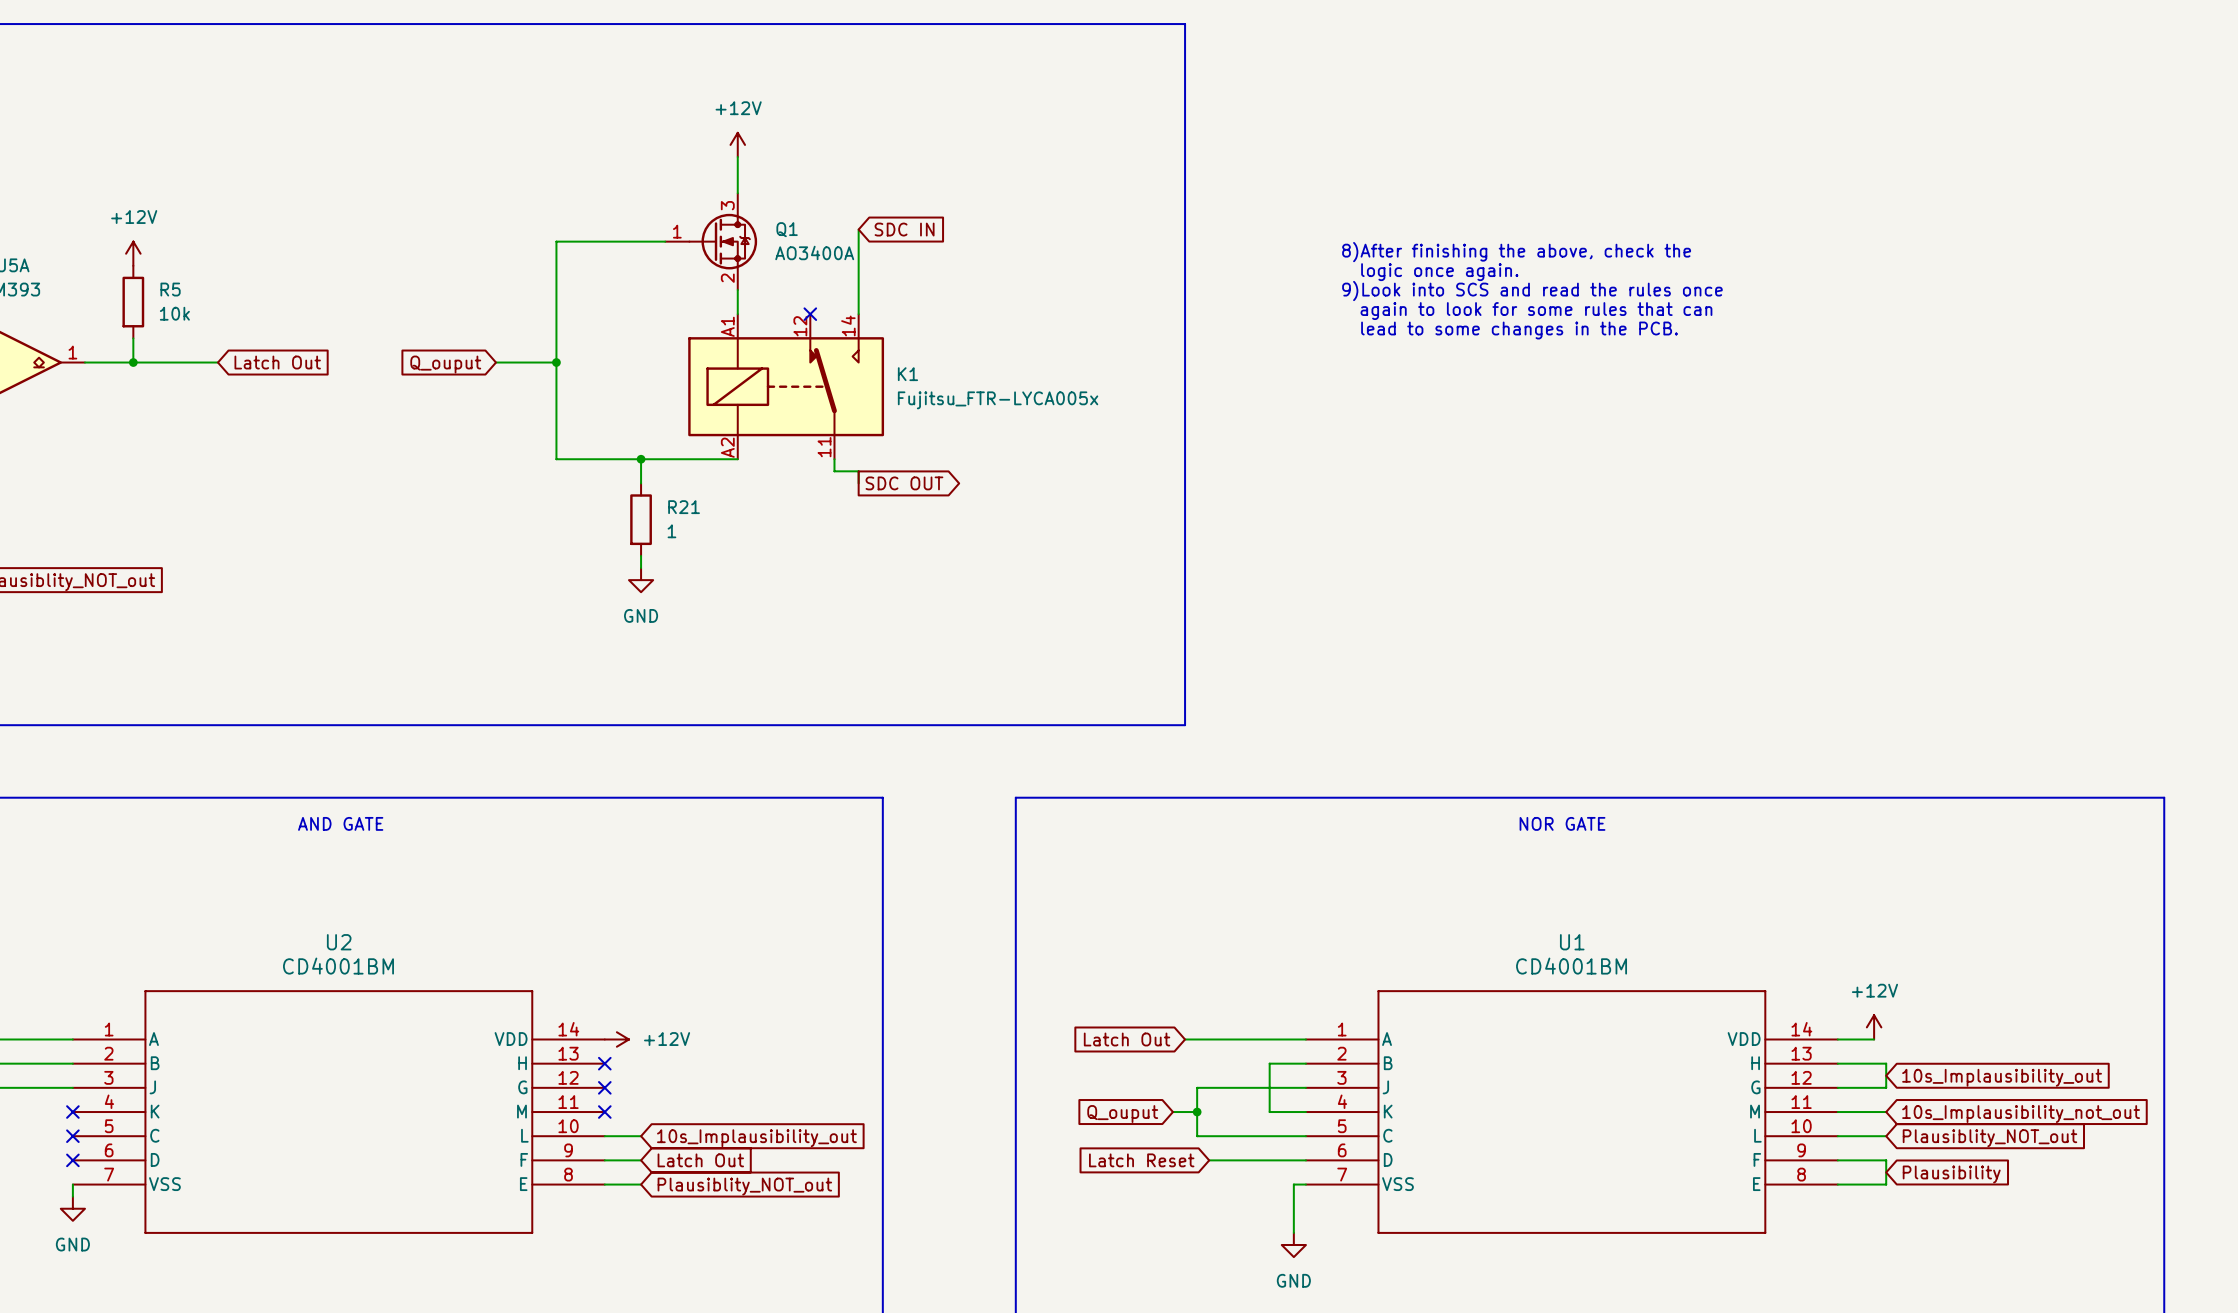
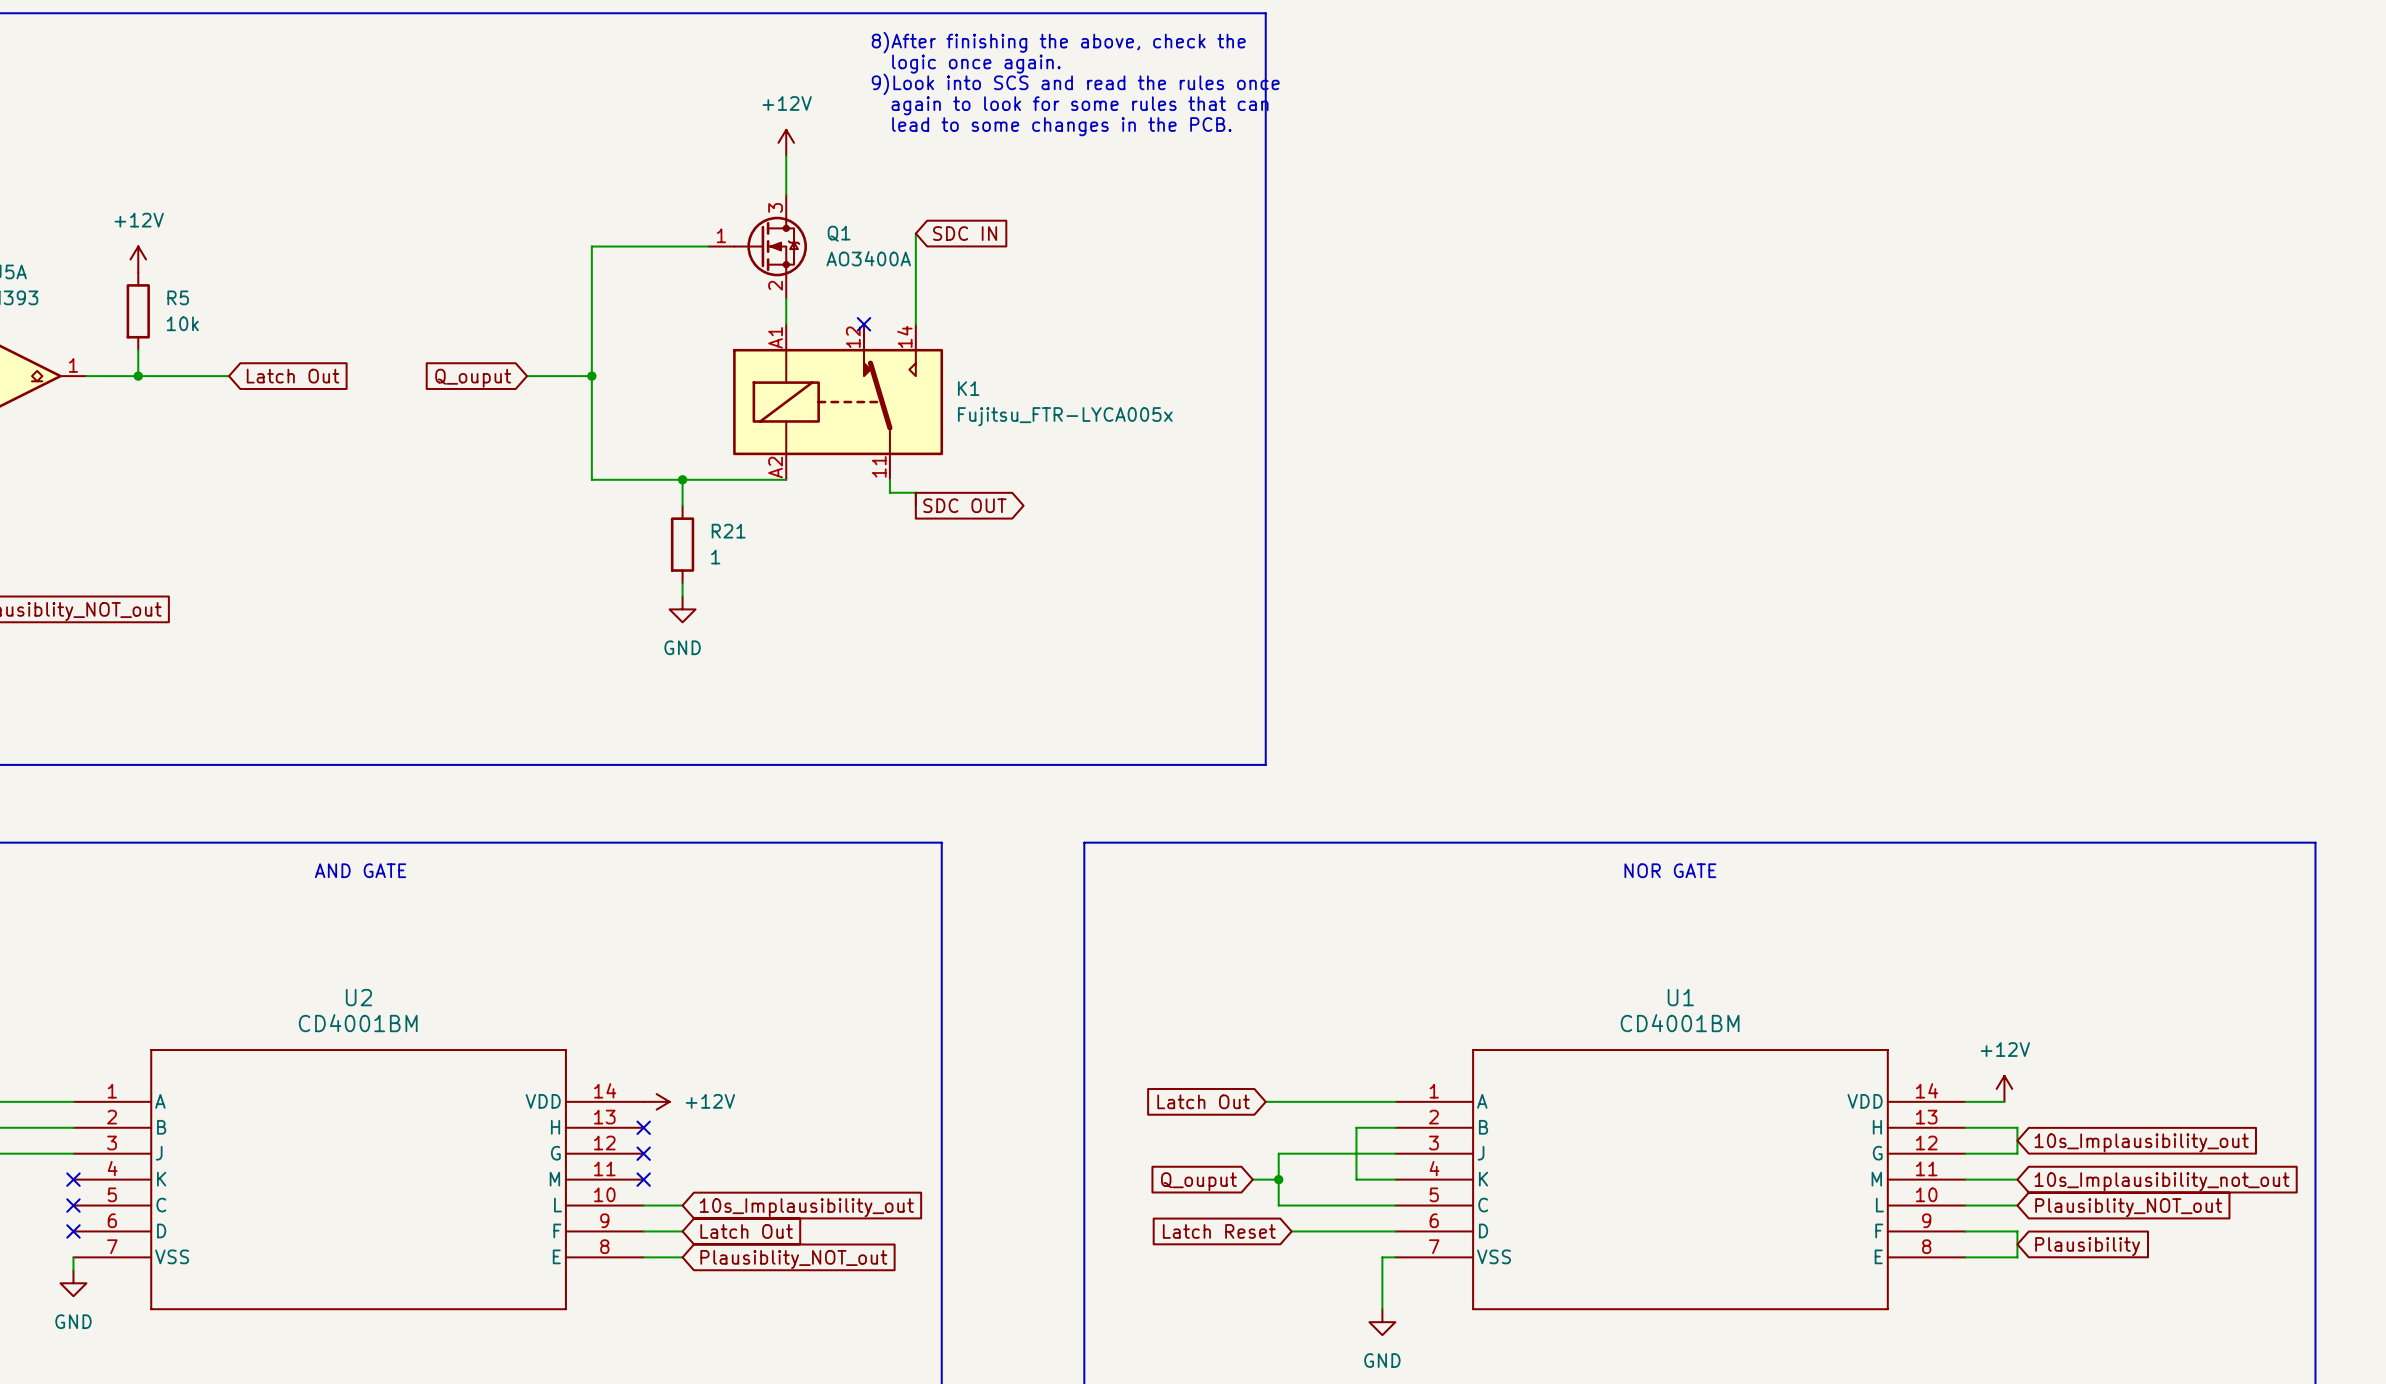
text: none -> 8)After finishing the above, check the (1058, 42)
text: none -> logic once again. (976, 64)
text: none -> 9)Look into SCS and read the rules once (1075, 84)
text: none -> again to look for some rules that can (1080, 105)
text: none -> lead to some changes in the PCB. (1061, 126)
text: 8)After finishing the above, check the (1516, 252) -> none
text: logic once again. (1439, 272) -> none
text: 9)Look into SCS and read the rules once (1532, 291) -> none
text: again to look for some rules that can (1536, 311) -> none
text: lead to some changes in the PCB. (1519, 330) -> none

